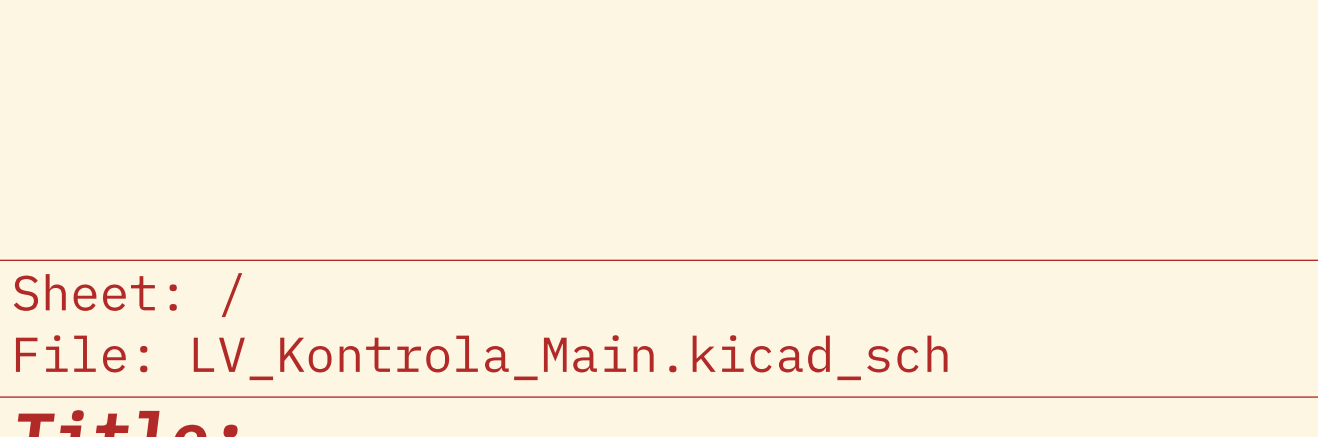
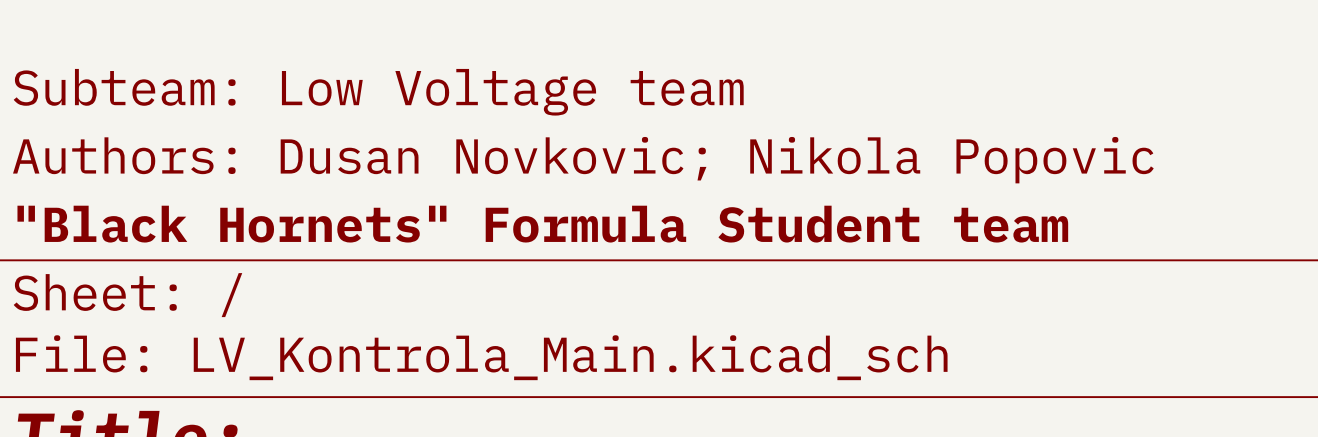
title block: none -> Subteam: Low Voltage team (378, 92)
title block: none -> Authors: Dusan Novkovic; Nikola Popovic (583, 160)
title block: none -> "Black Hornets" Formula Student team (542, 224)

